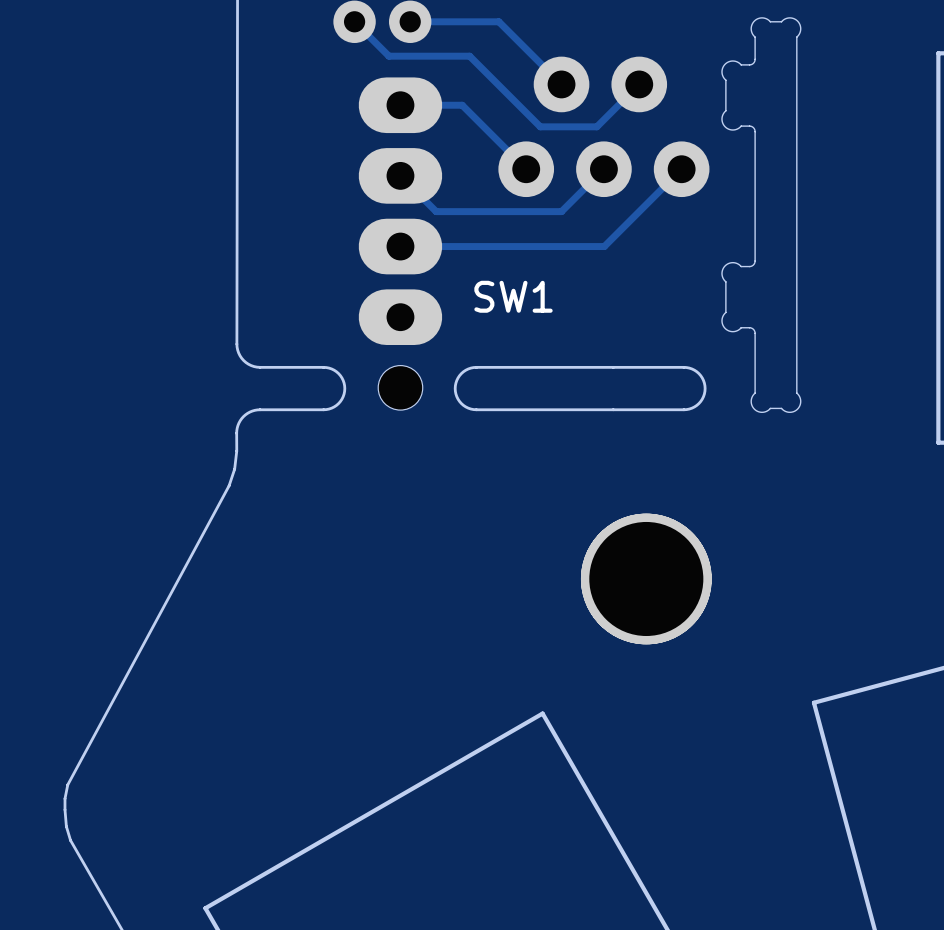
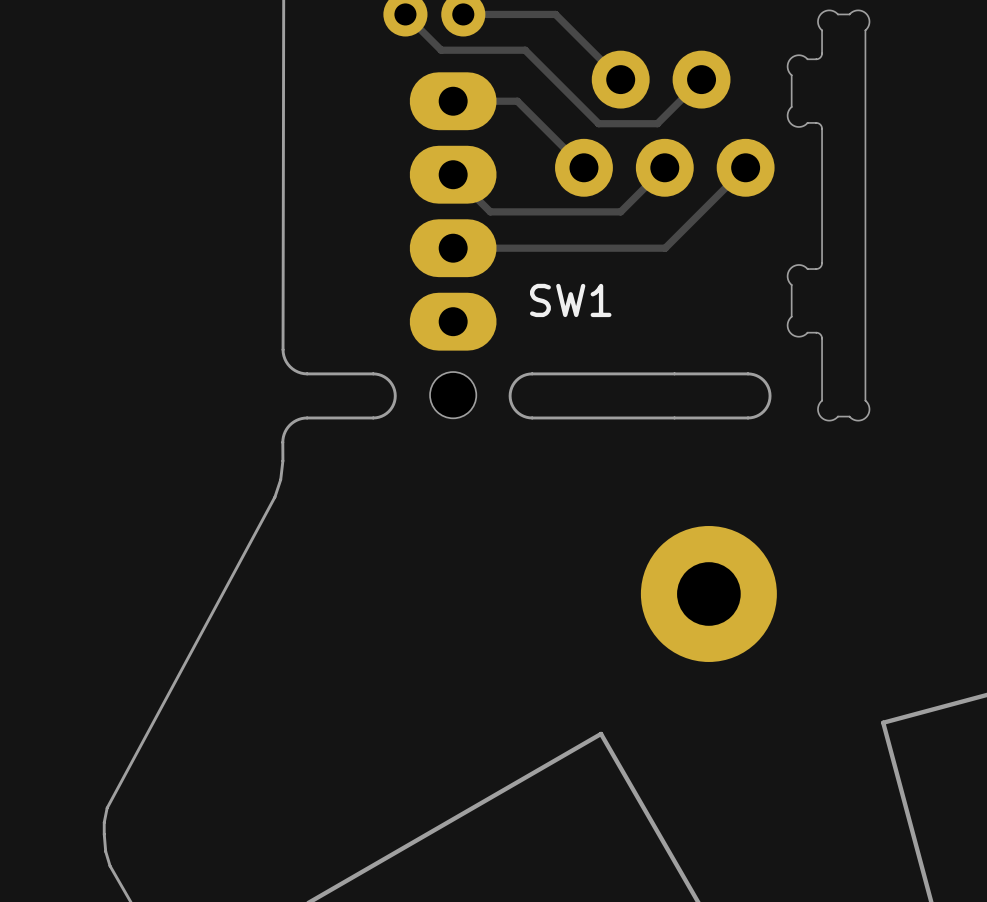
part: (646, 578) -> none

